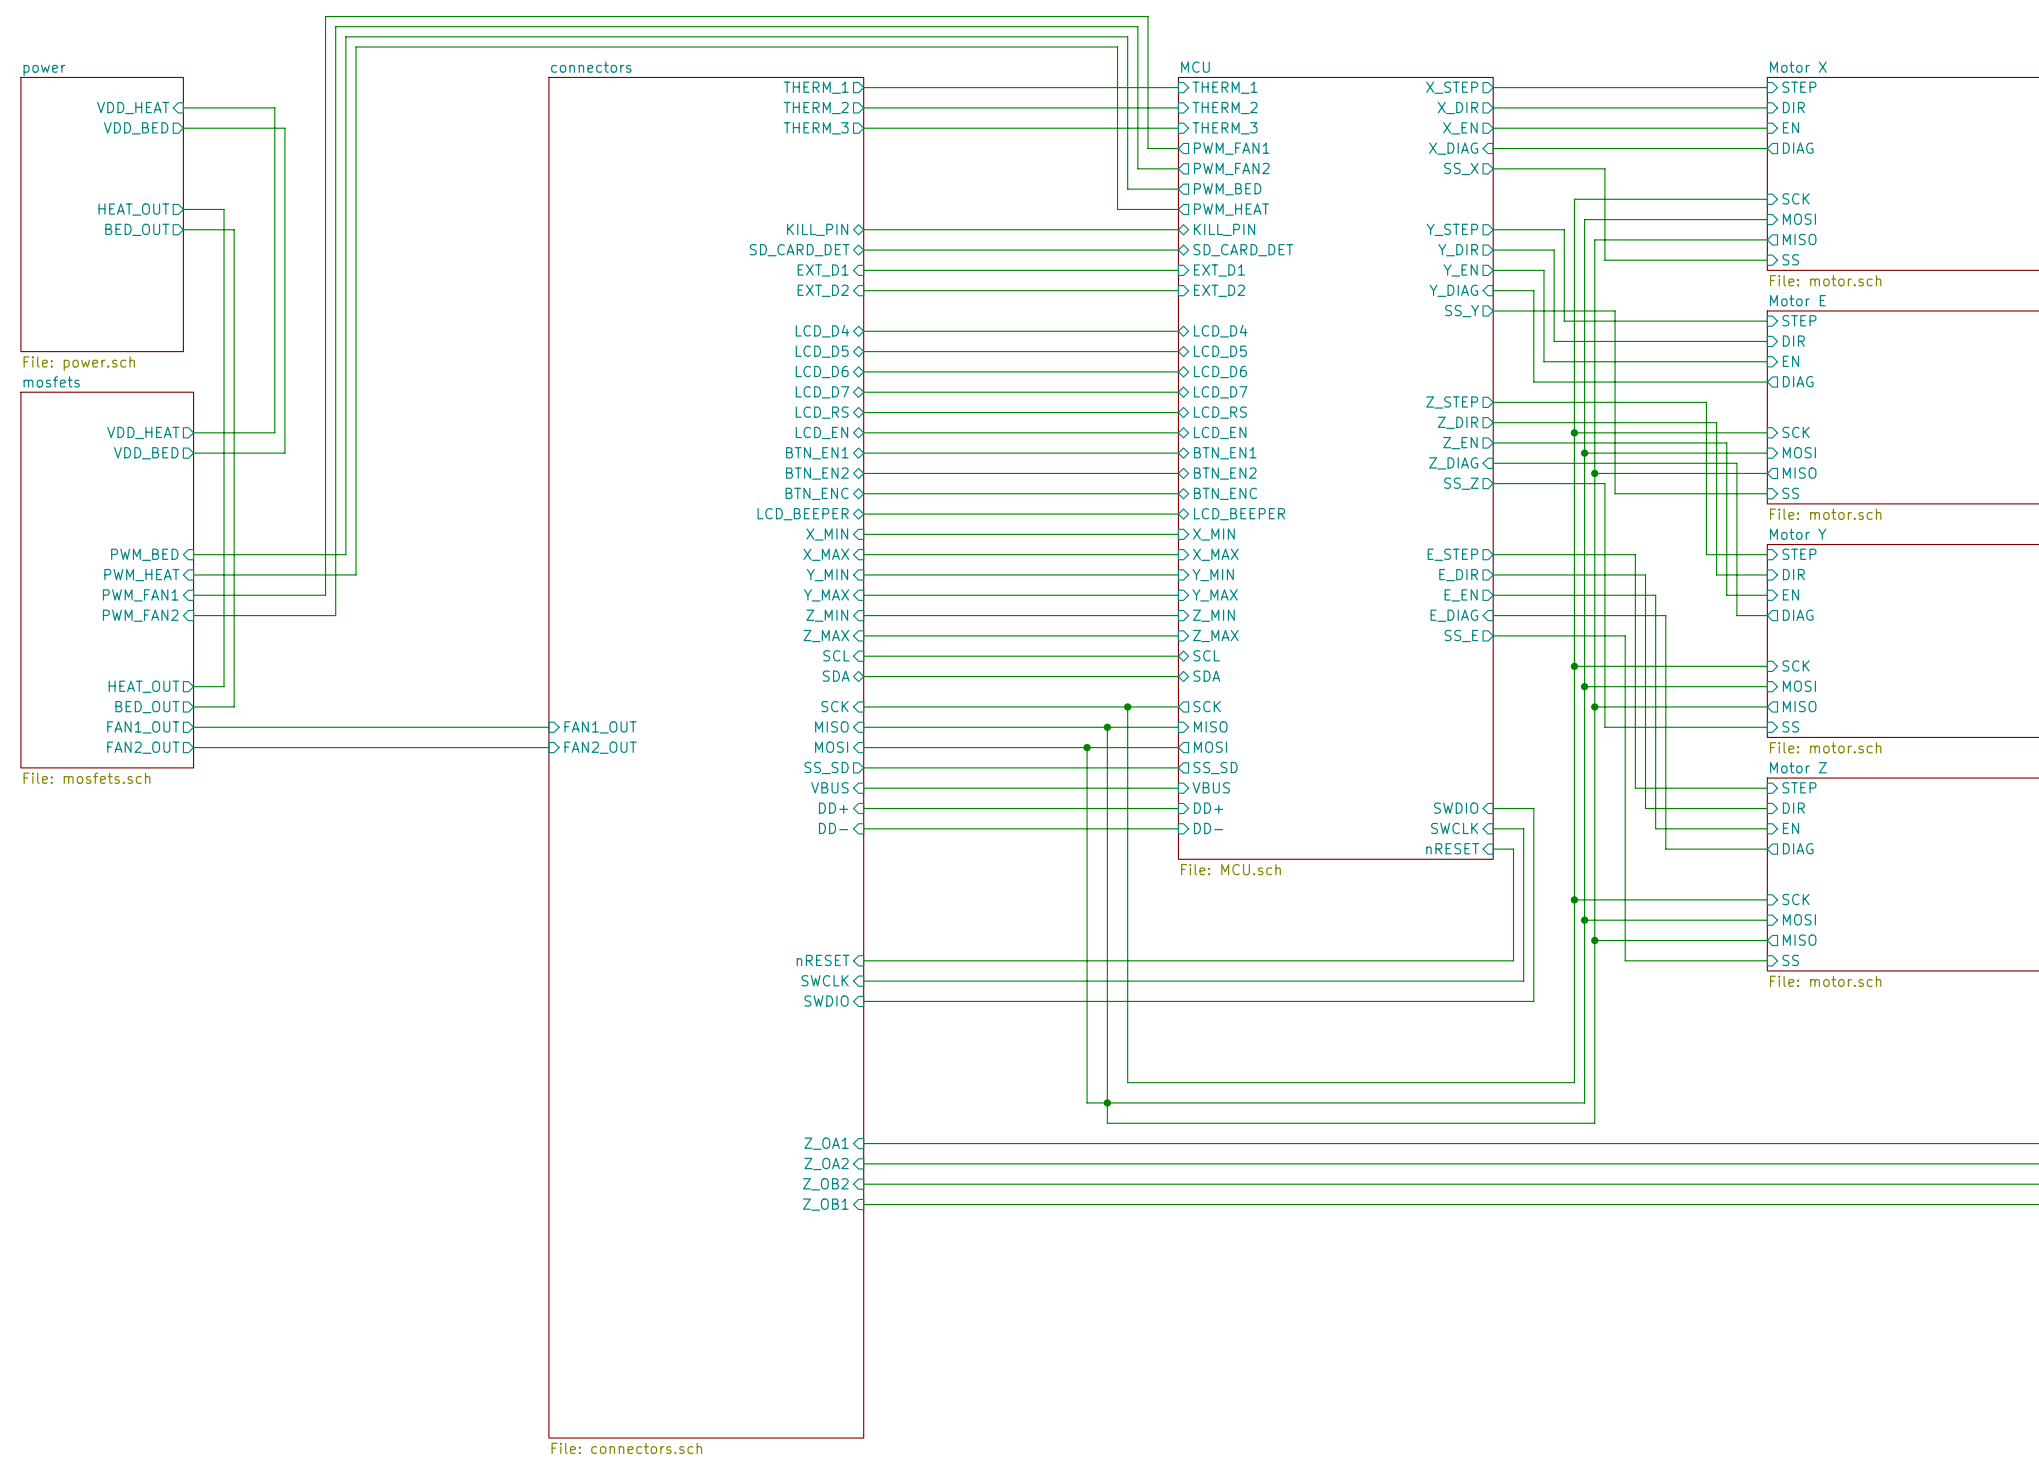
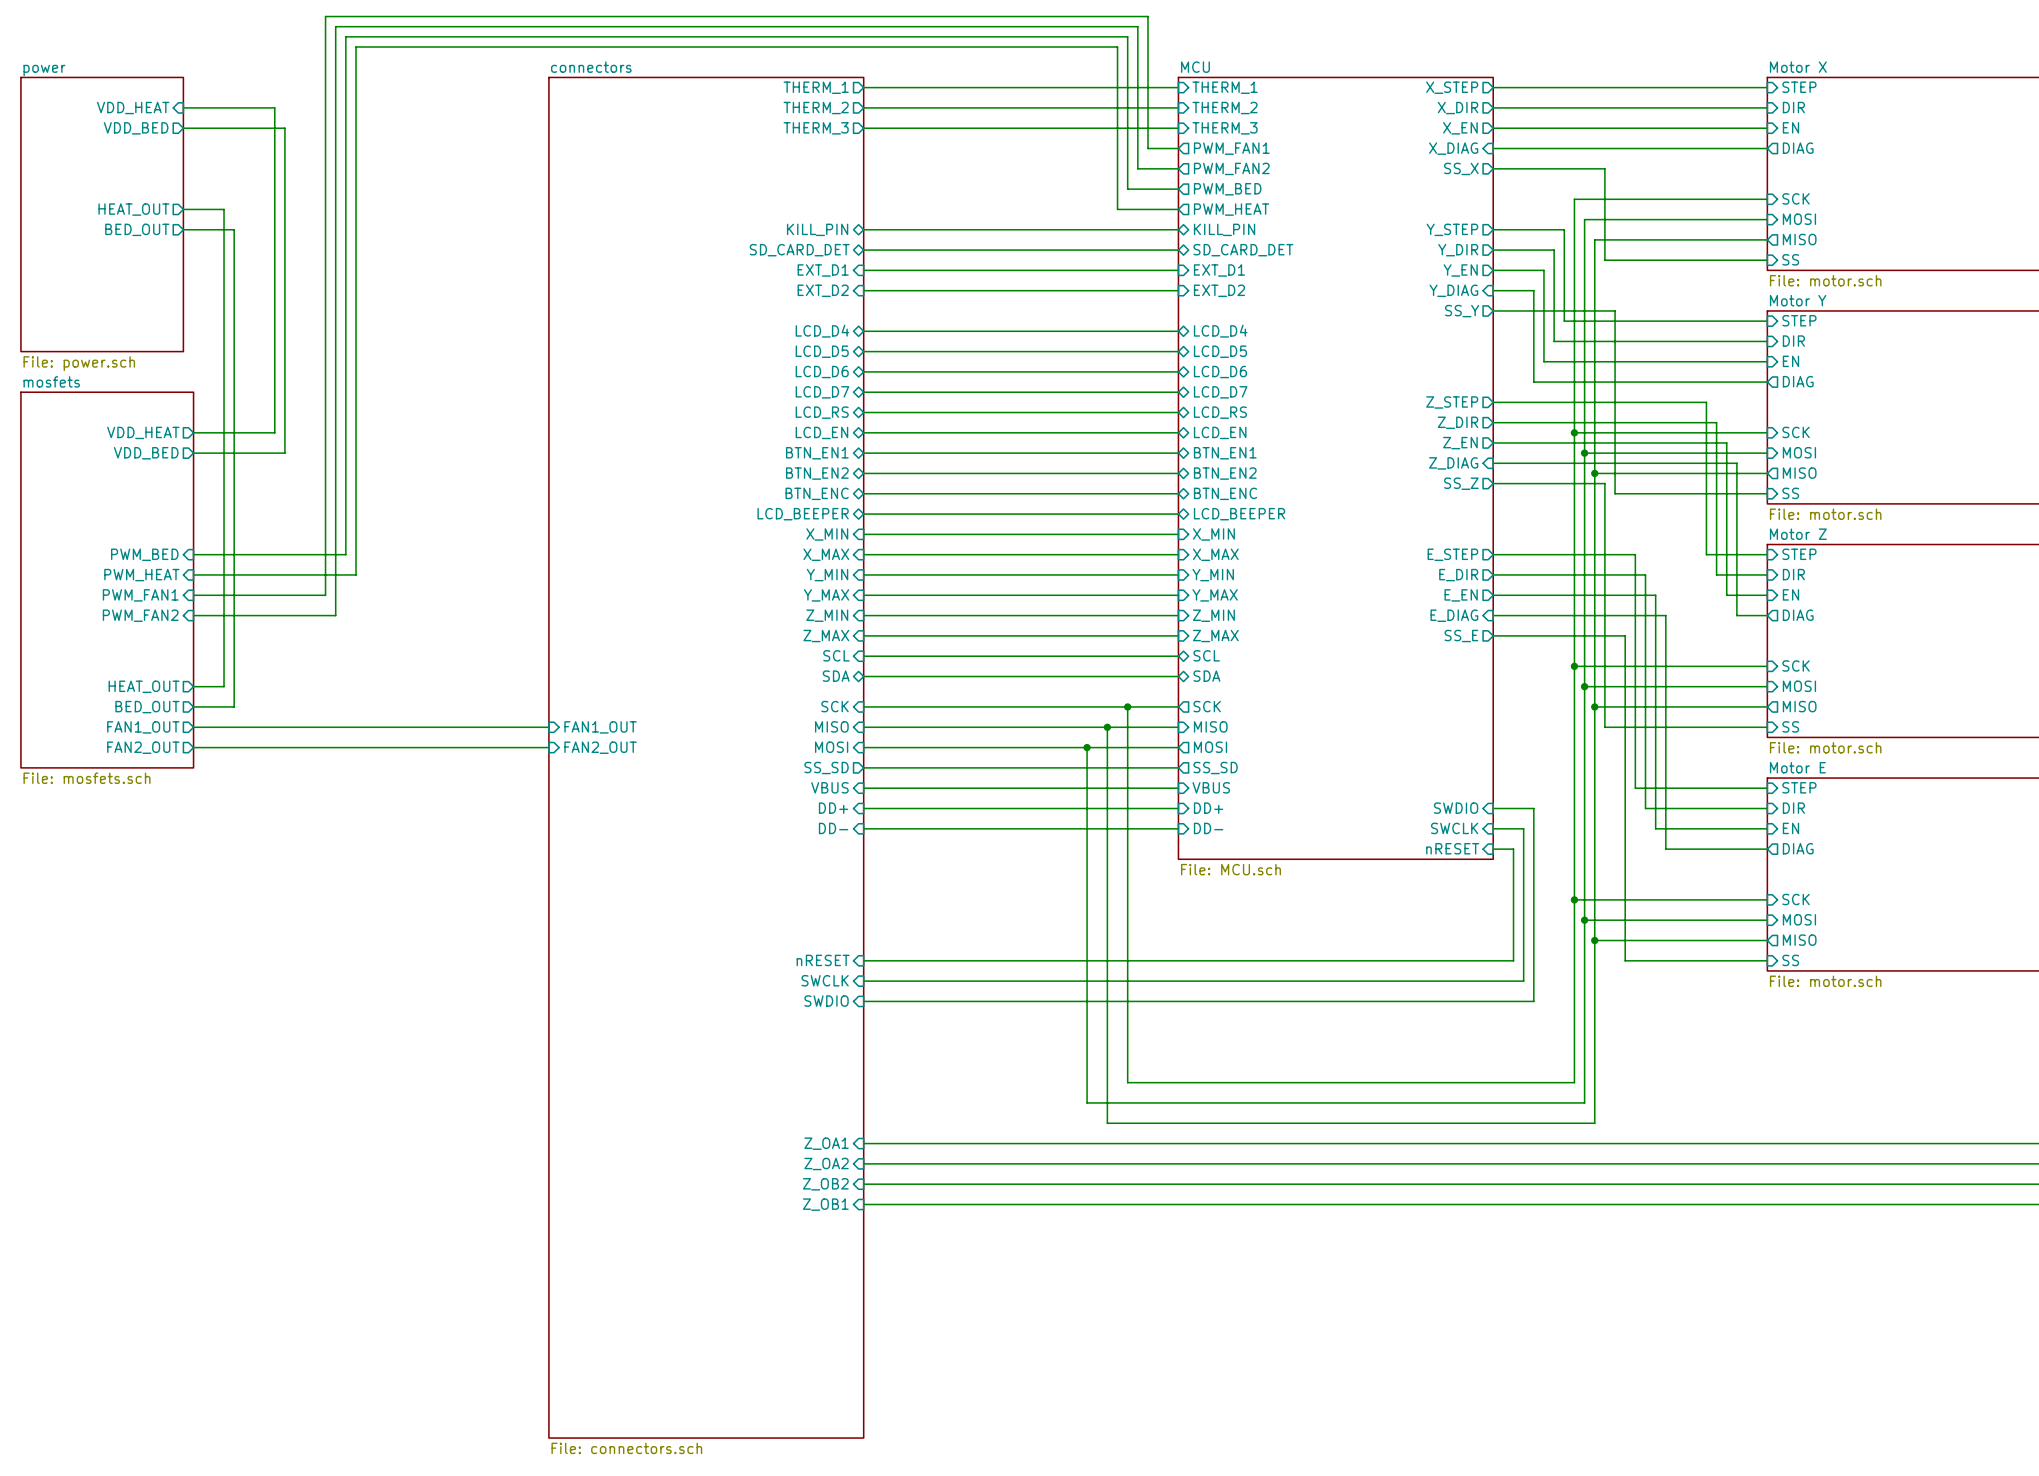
sheet Motor E name: Motor E (1797, 300) -> Motor Y (1798, 300)
sheet Motor Y name: Motor Y (1798, 534) -> Motor Z (1798, 534)
sheet Motor Z name: Motor Z (1798, 767) -> Motor E (1797, 767)
junction: (1107, 1102) -> none

